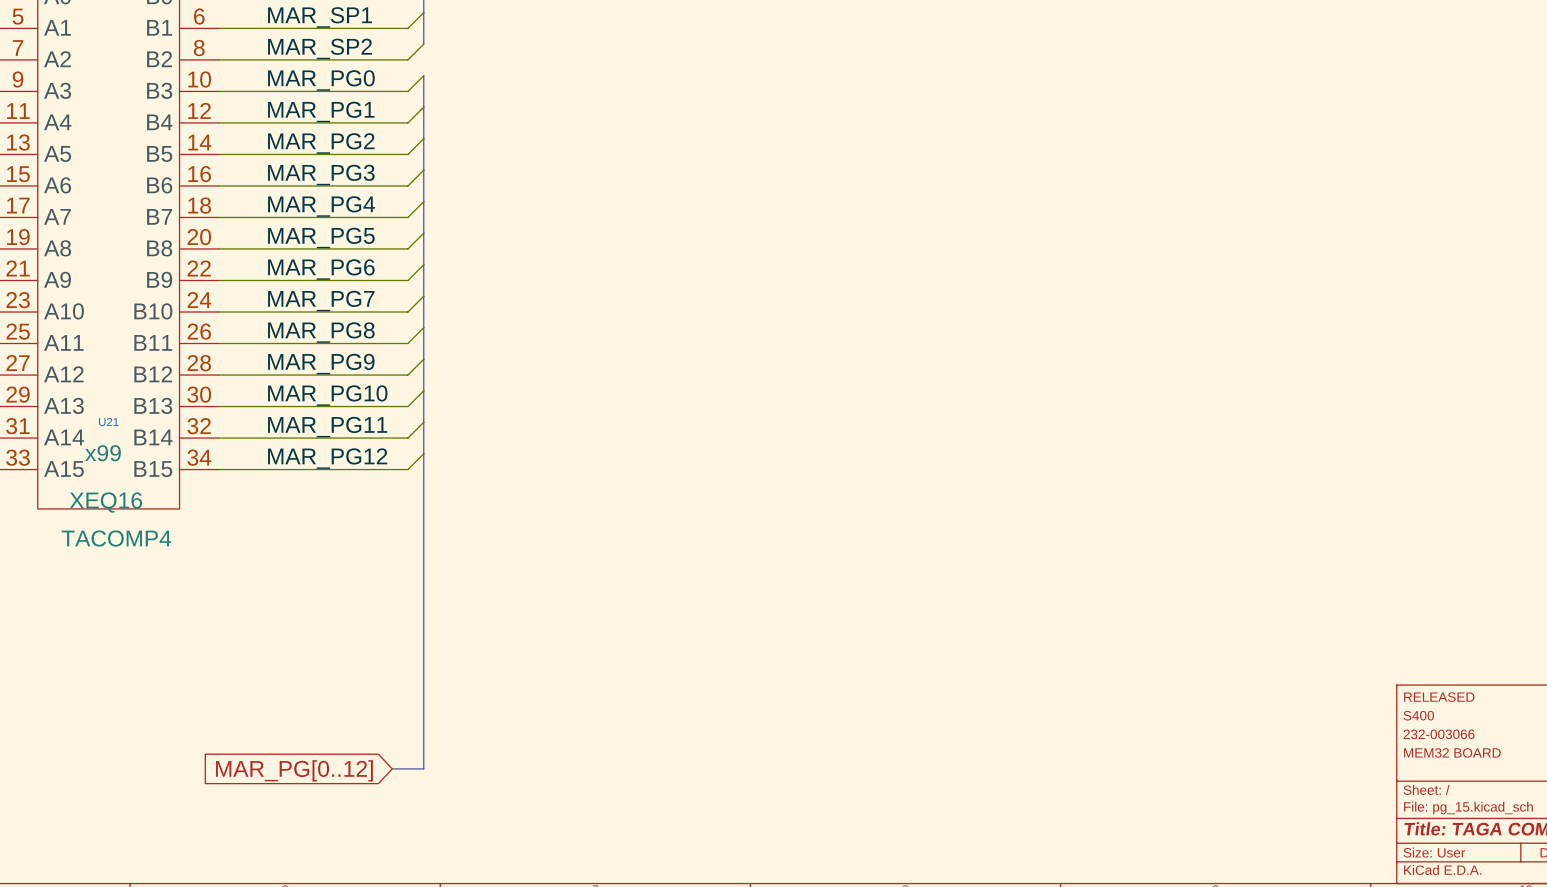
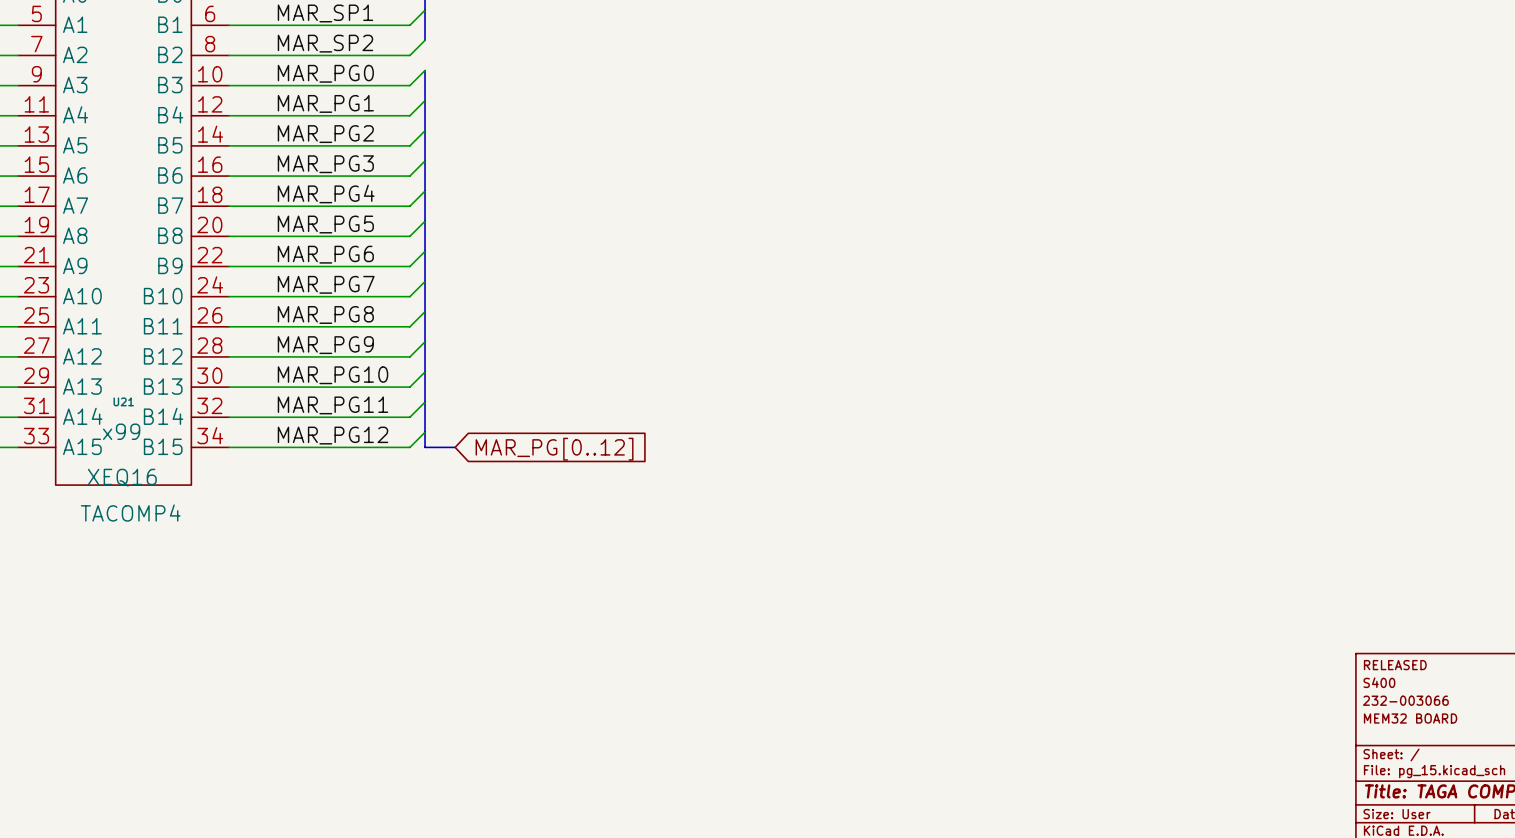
bus: (423, 469) (423, 768) (392, 768) -> (425, 447) (455, 447)
global label: none -> MAR_PG[0..12] (554, 449)
global label: MAR_PG[0..12] (294, 770) -> none

